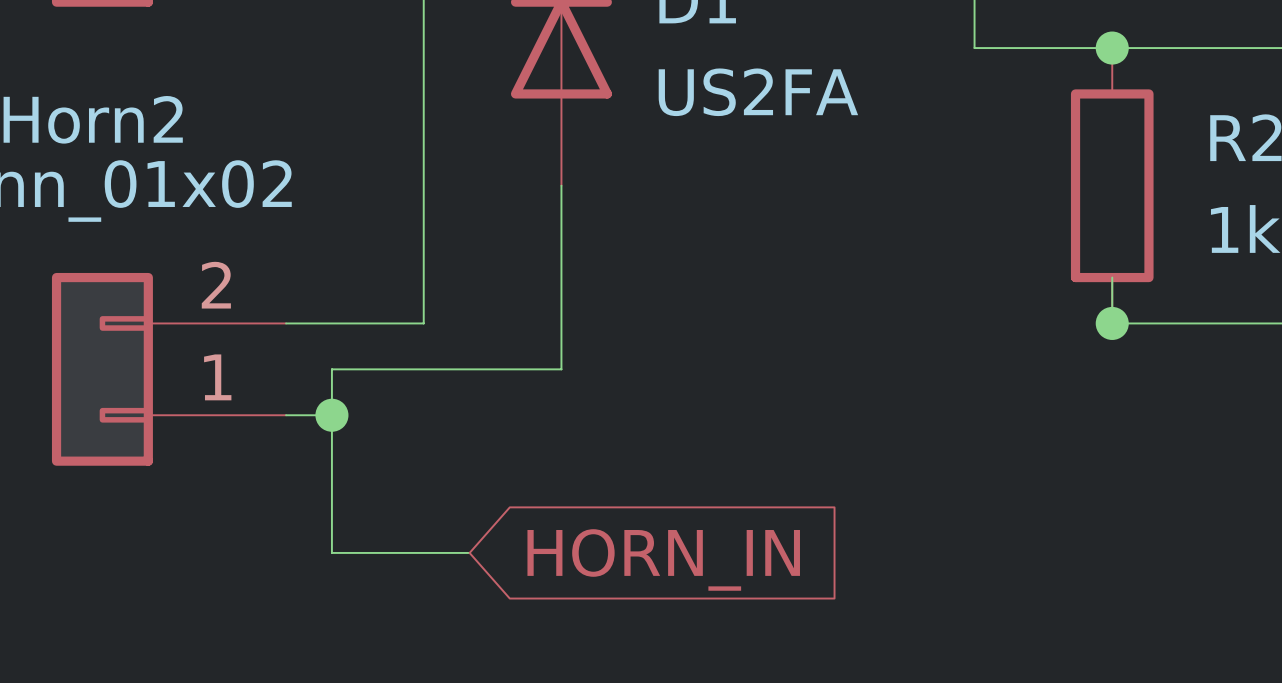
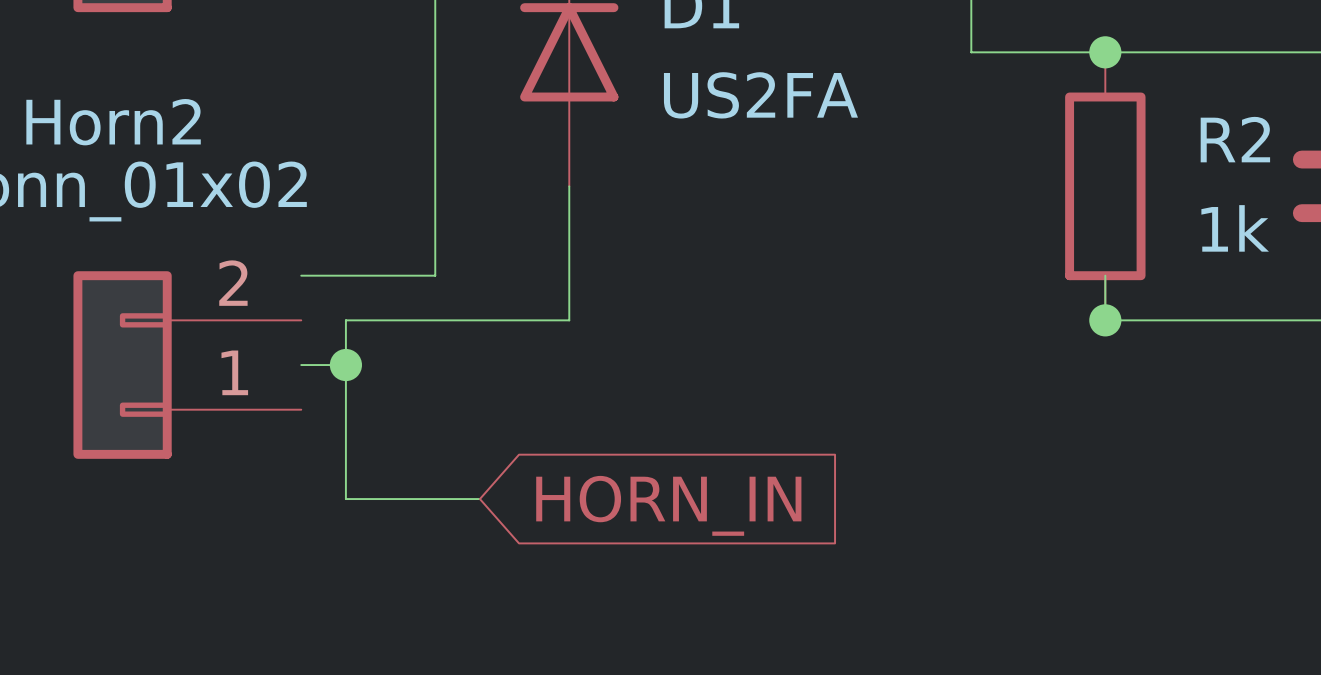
wire: (423, 277) (423, 323) -> (435, 275) (301, 275)
wire: (286, 323) (331, 323) -> (301, 365) (345, 365) (345, 320)
wire: (561, 323) (561, 369) (331, 369) -> (569, 320) (435, 320)
wire: (286, 415) (331, 415) -> none
junction position: (331, 415) -> (345, 365)
wire: (331, 507) (331, 552) (469, 552) -> (345, 499) (479, 499)
global label position: HORN_IN (663, 559) -> HORN_IN (668, 505)

